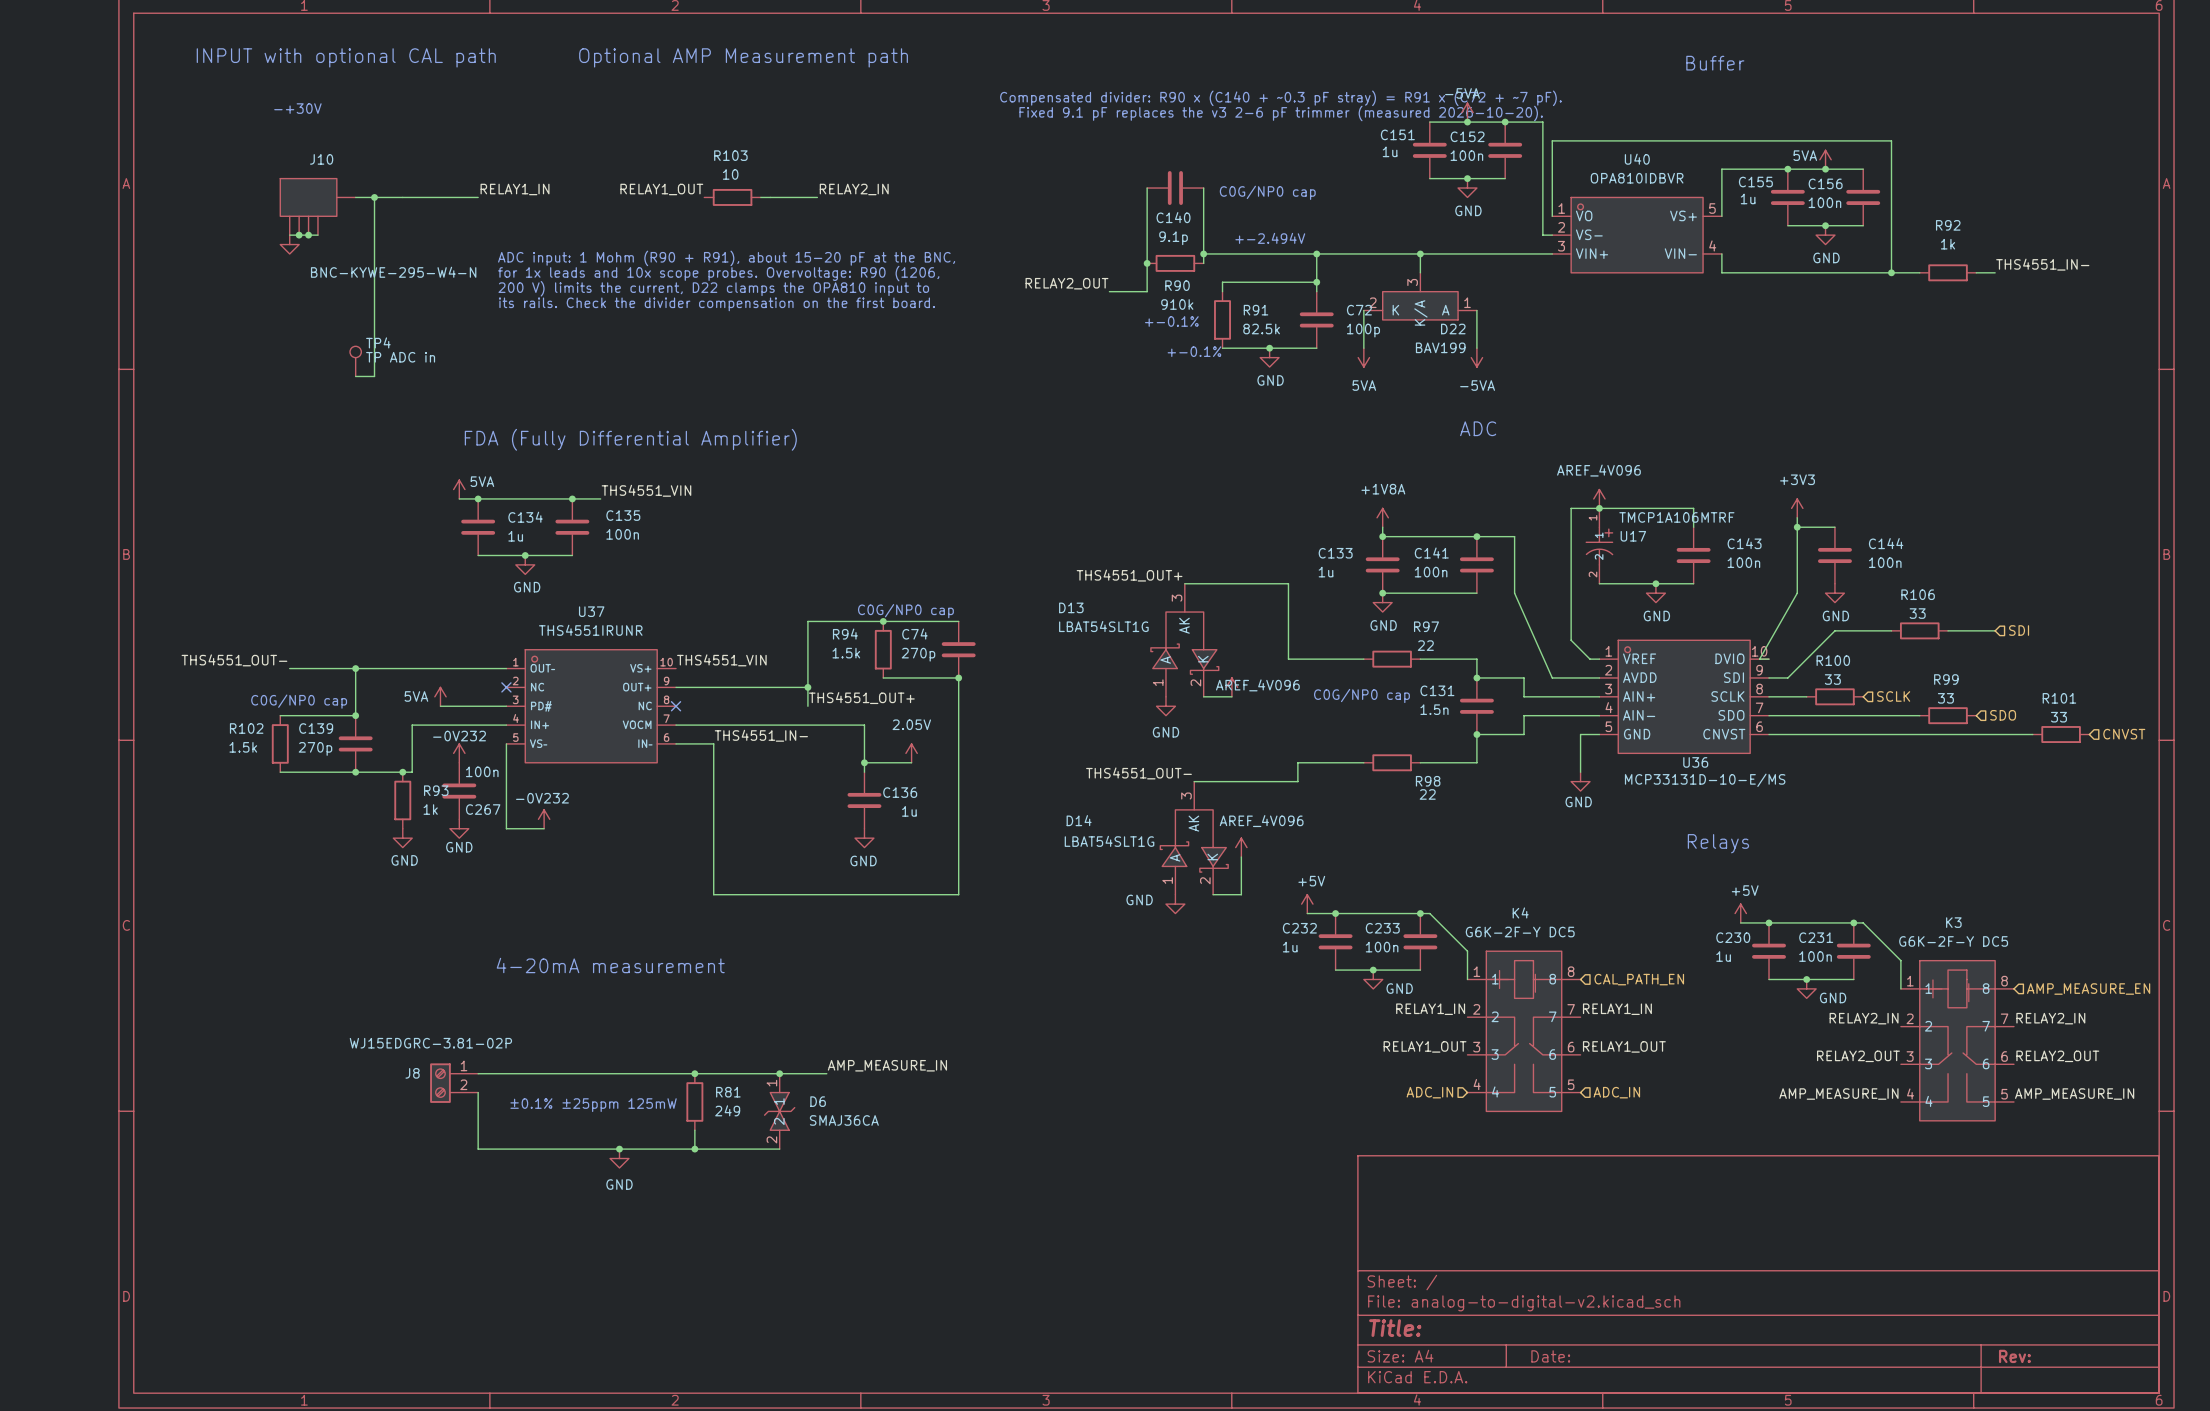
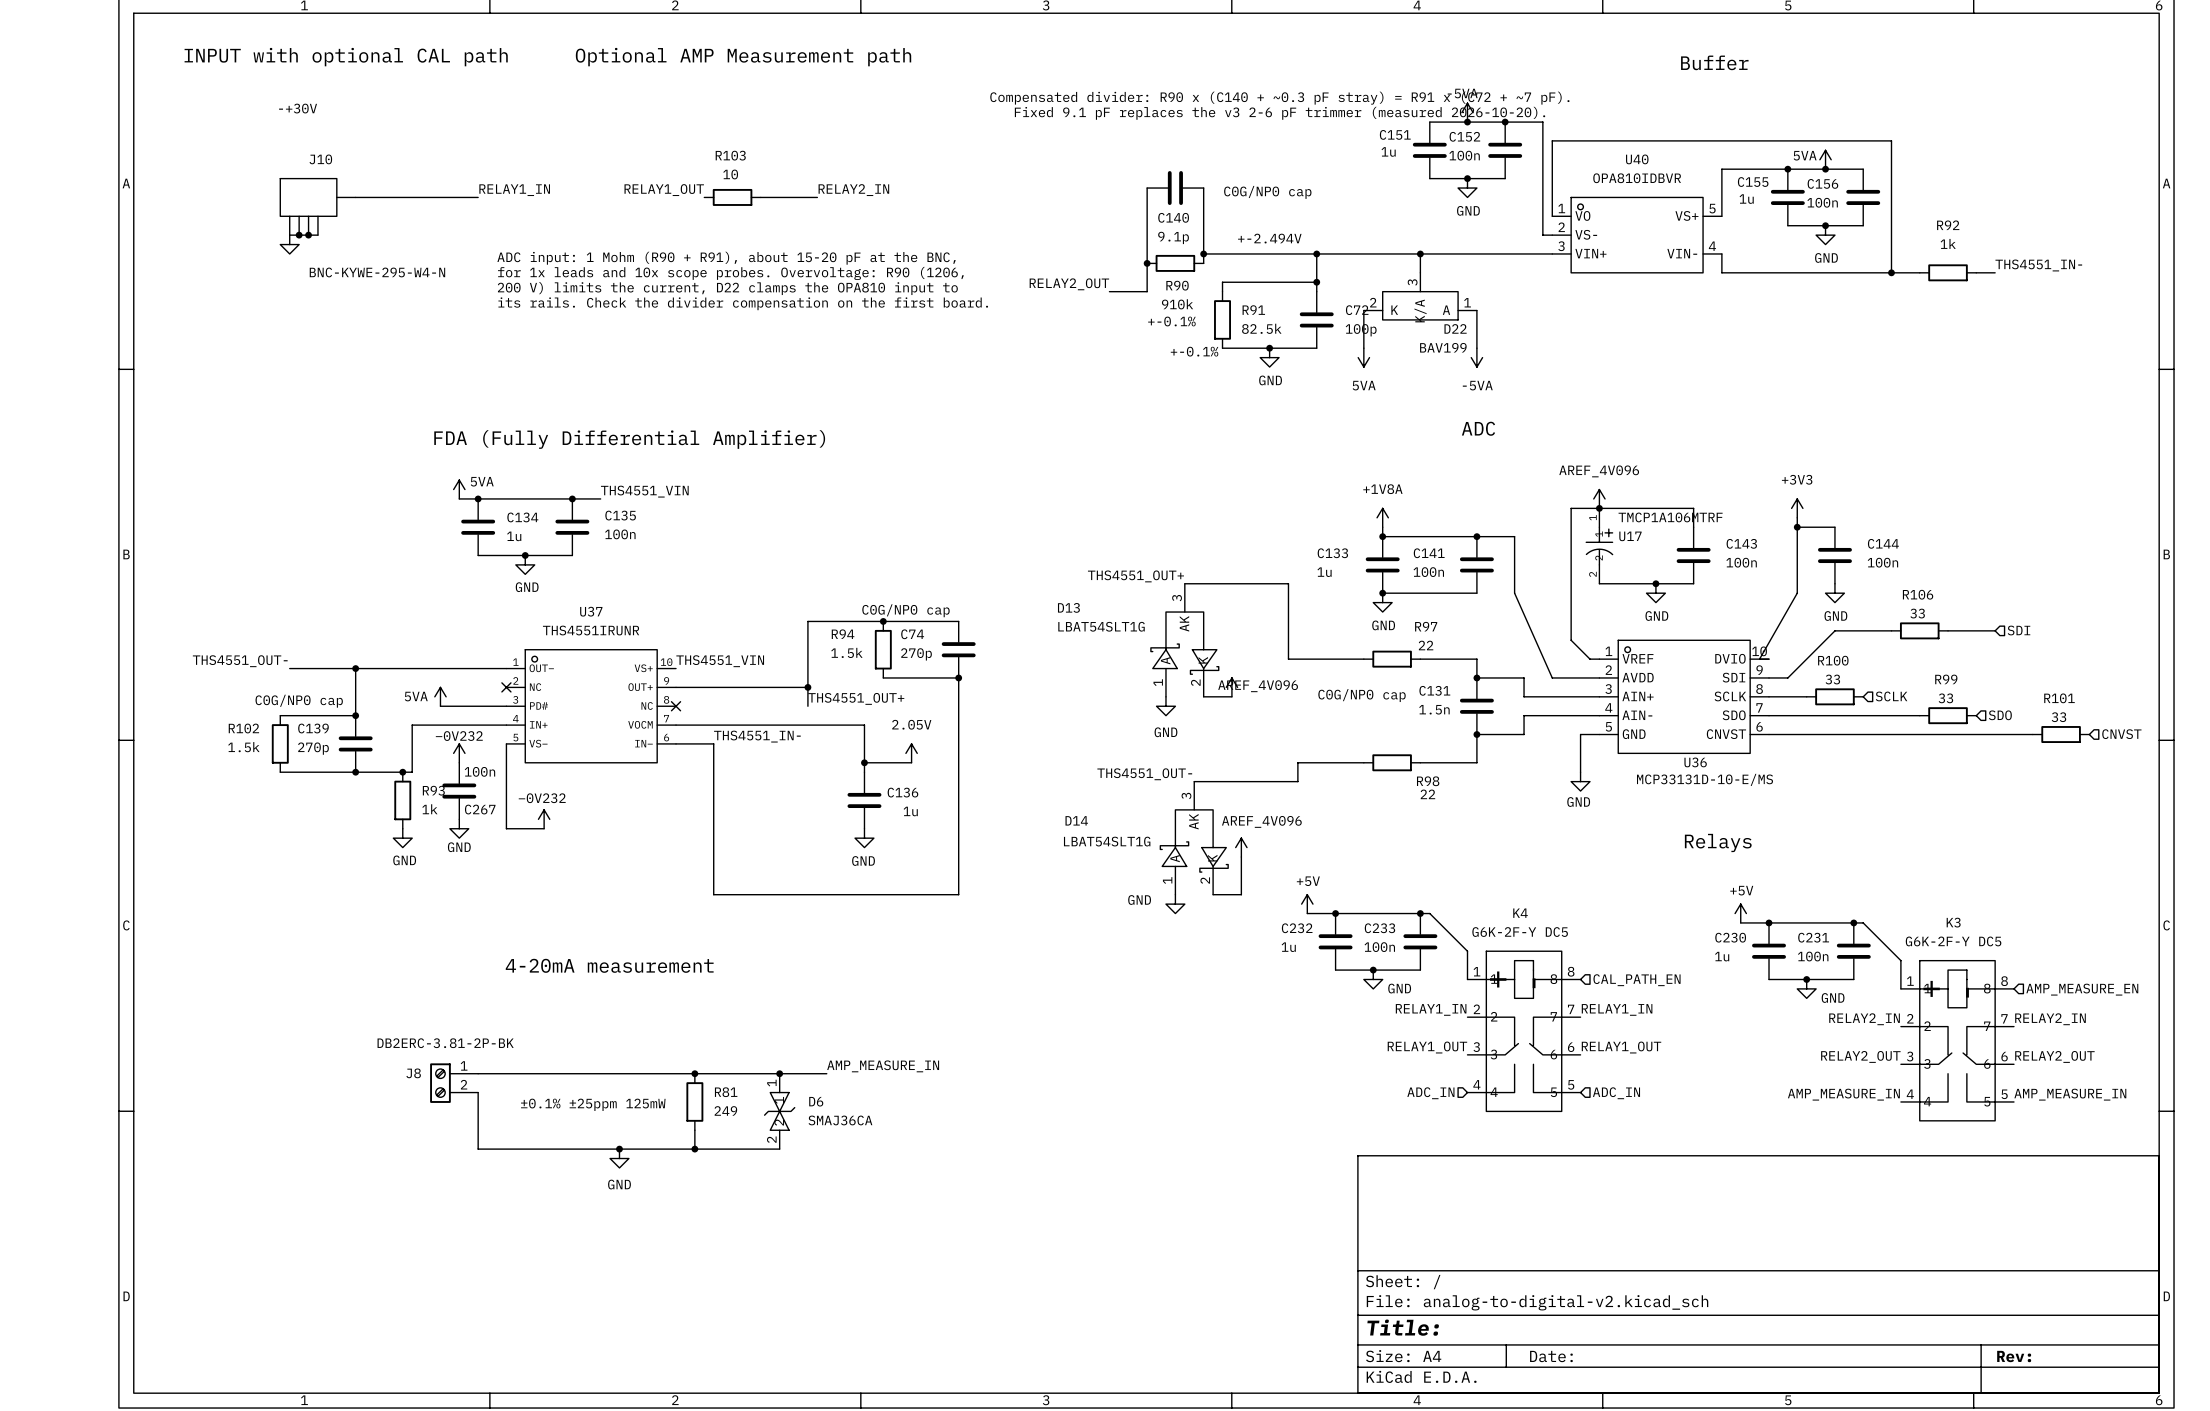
wire: (374, 197) (374, 376) (355, 376) -> none
junction: (374, 197) -> none
TP4: TP ADC in (355, 361) -> none
J8 value: WJ15EDGRC-3.81-02P (430, 1043) -> DB2ERC-3.81-2P-BK (445, 1043)

